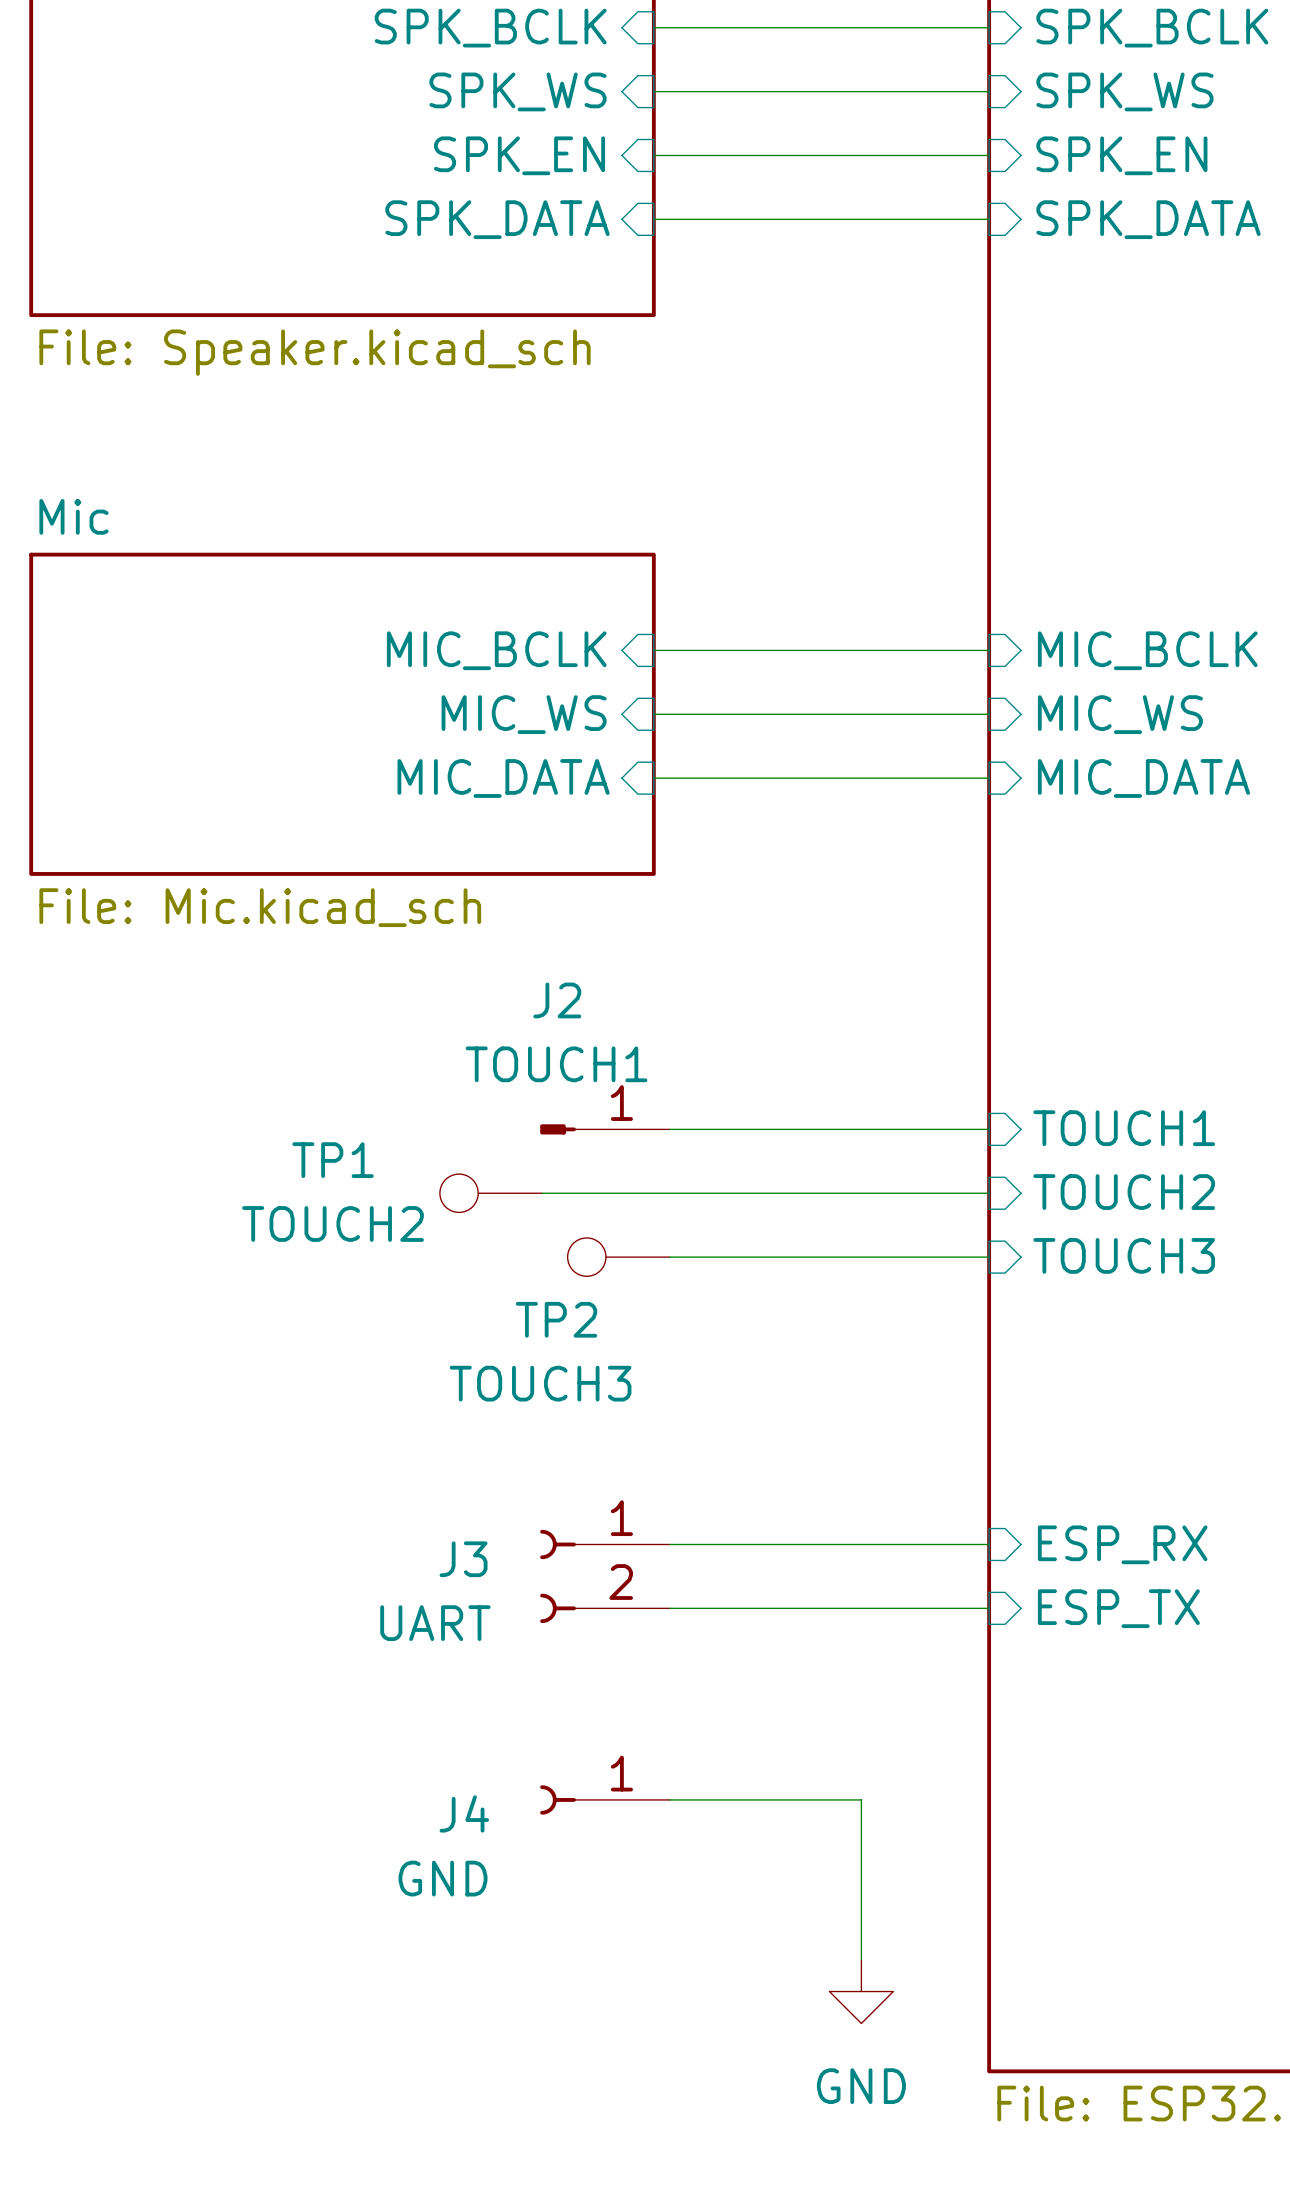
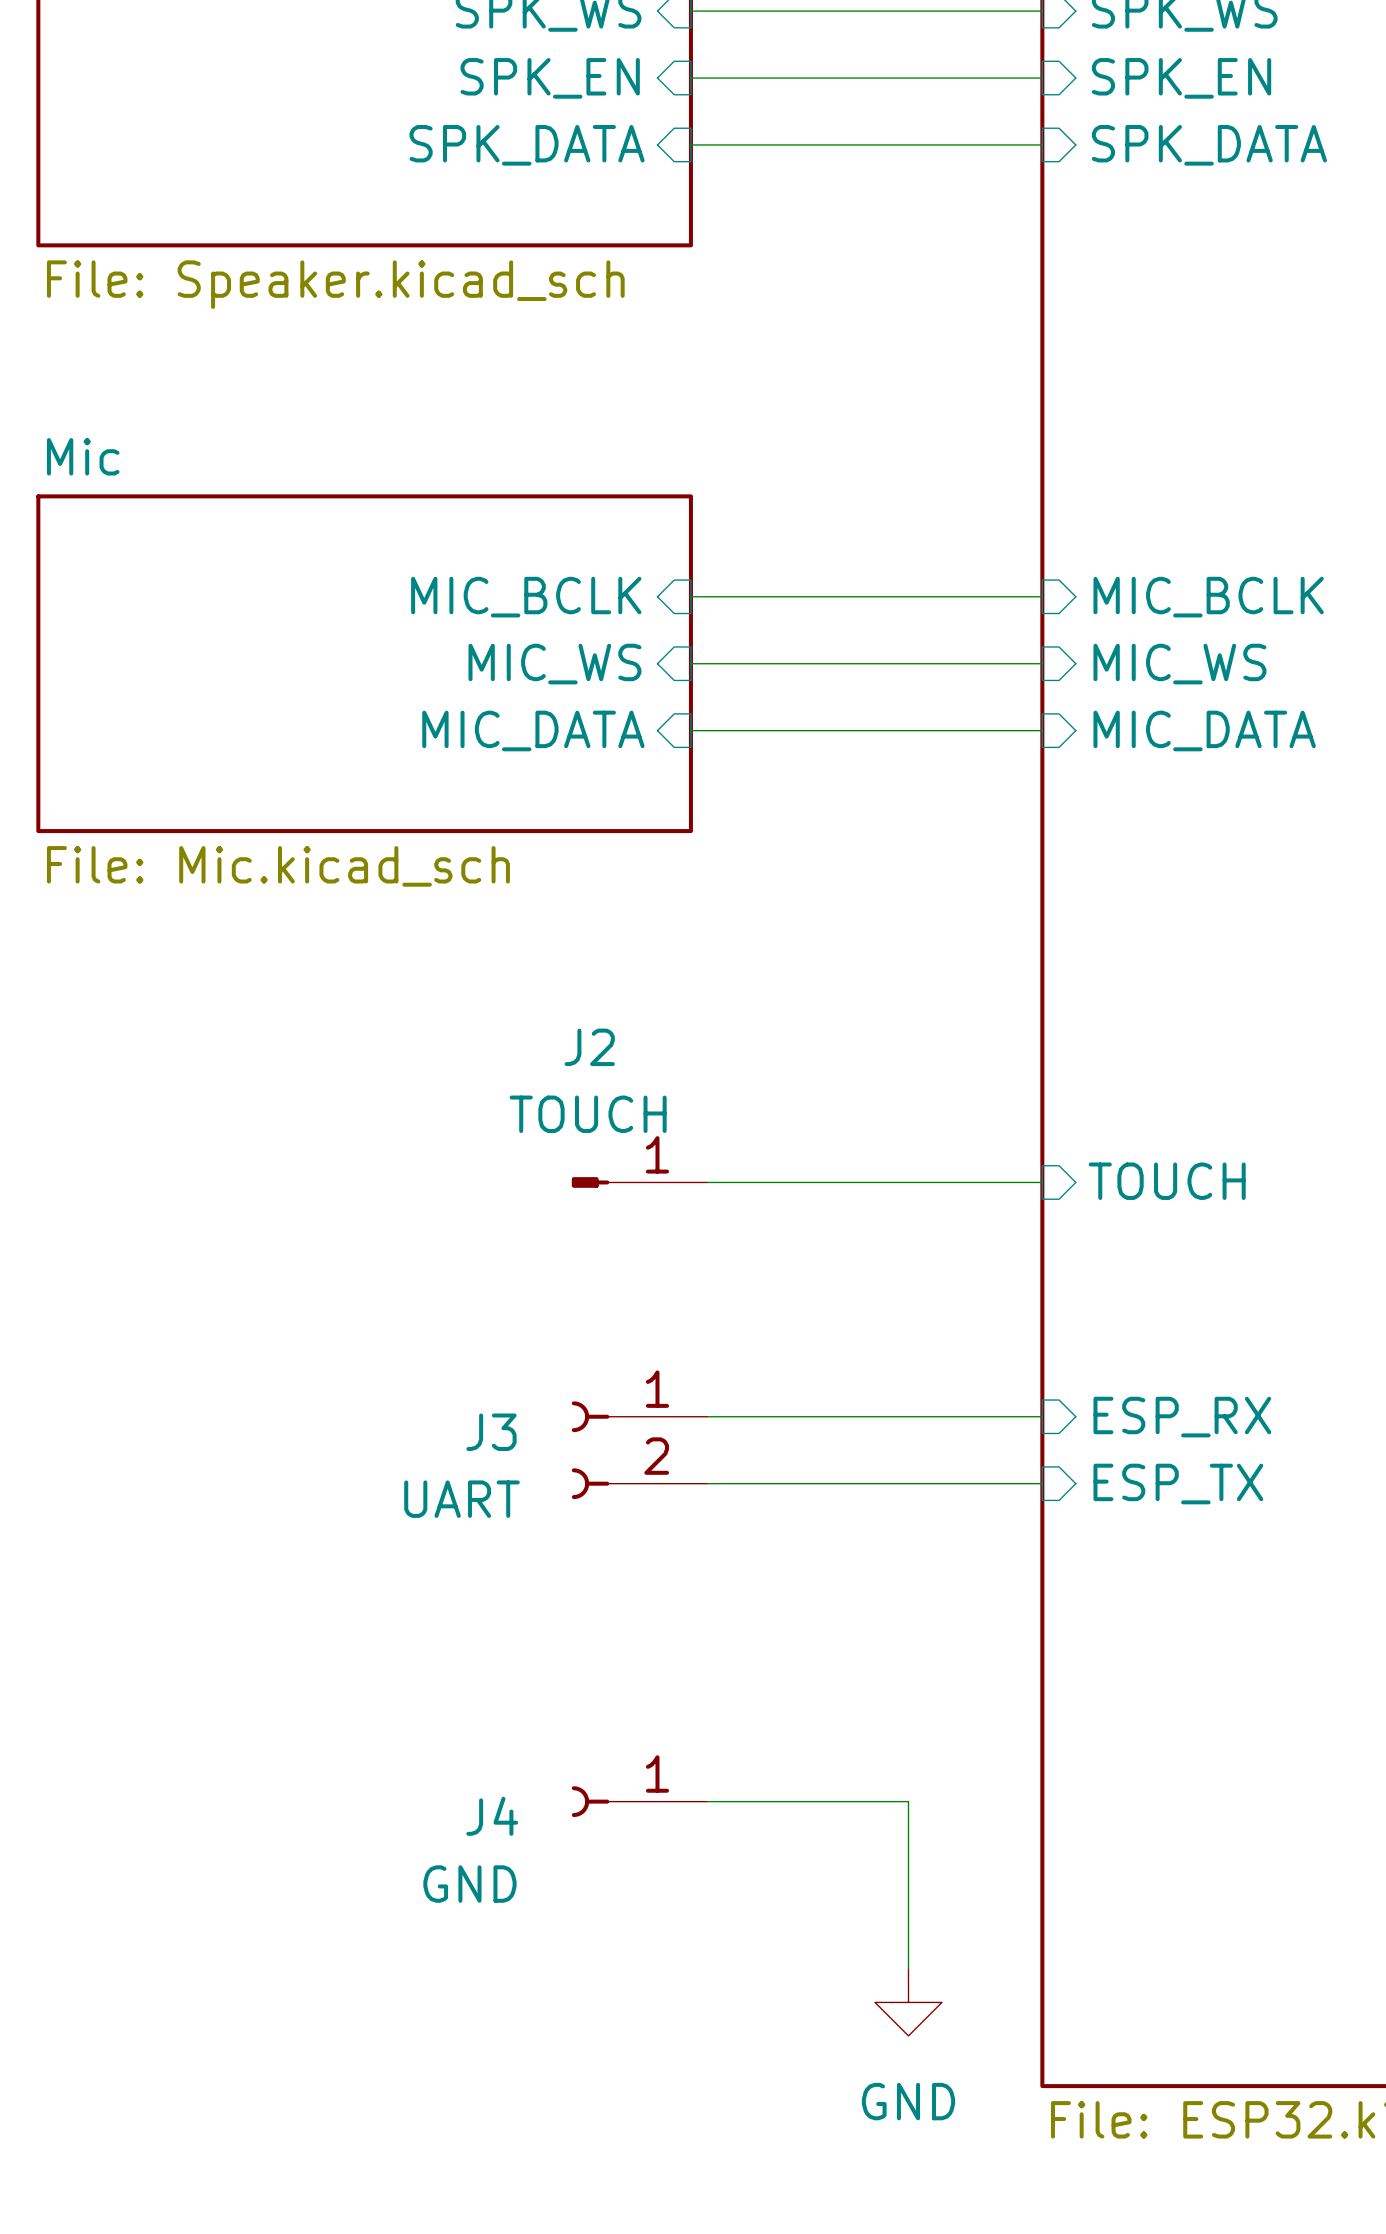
J2 value: TOUCH1 (556, 1064) -> TOUCH (588, 1114)
sheet pin: TOUCH1 (1124, 1128) -> none
J2 position: (604, 1129) -> (639, 1182)
wire: (669, 1129) (989, 1129) -> none
sheet pin: TOUCH2 (1124, 1192) -> TOUCH (1167, 1181)
TP1: TOUCH2 (490, 1193) -> none
wire: (542, 1193) (989, 1193) -> none
sheet pin: TOUCH3 (1124, 1255) -> none
TP2: TOUCH3 (618, 1257) -> none
wire: (669, 1257) (989, 1257) -> (707, 1182) (1042, 1182)
wire: (669, 1544) (989, 1544) -> (707, 1483) (1042, 1483)
sheet pin position: ESP_RX (1122, 1544) -> ESP_RX (1182, 1417)
J3 position: (604, 1576) -> (639, 1450)
wire: (669, 1608) (989, 1608) -> (707, 1416) (1042, 1416)
sheet pin position: ESP_TX (1118, 1608) -> ESP_TX (1178, 1484)

